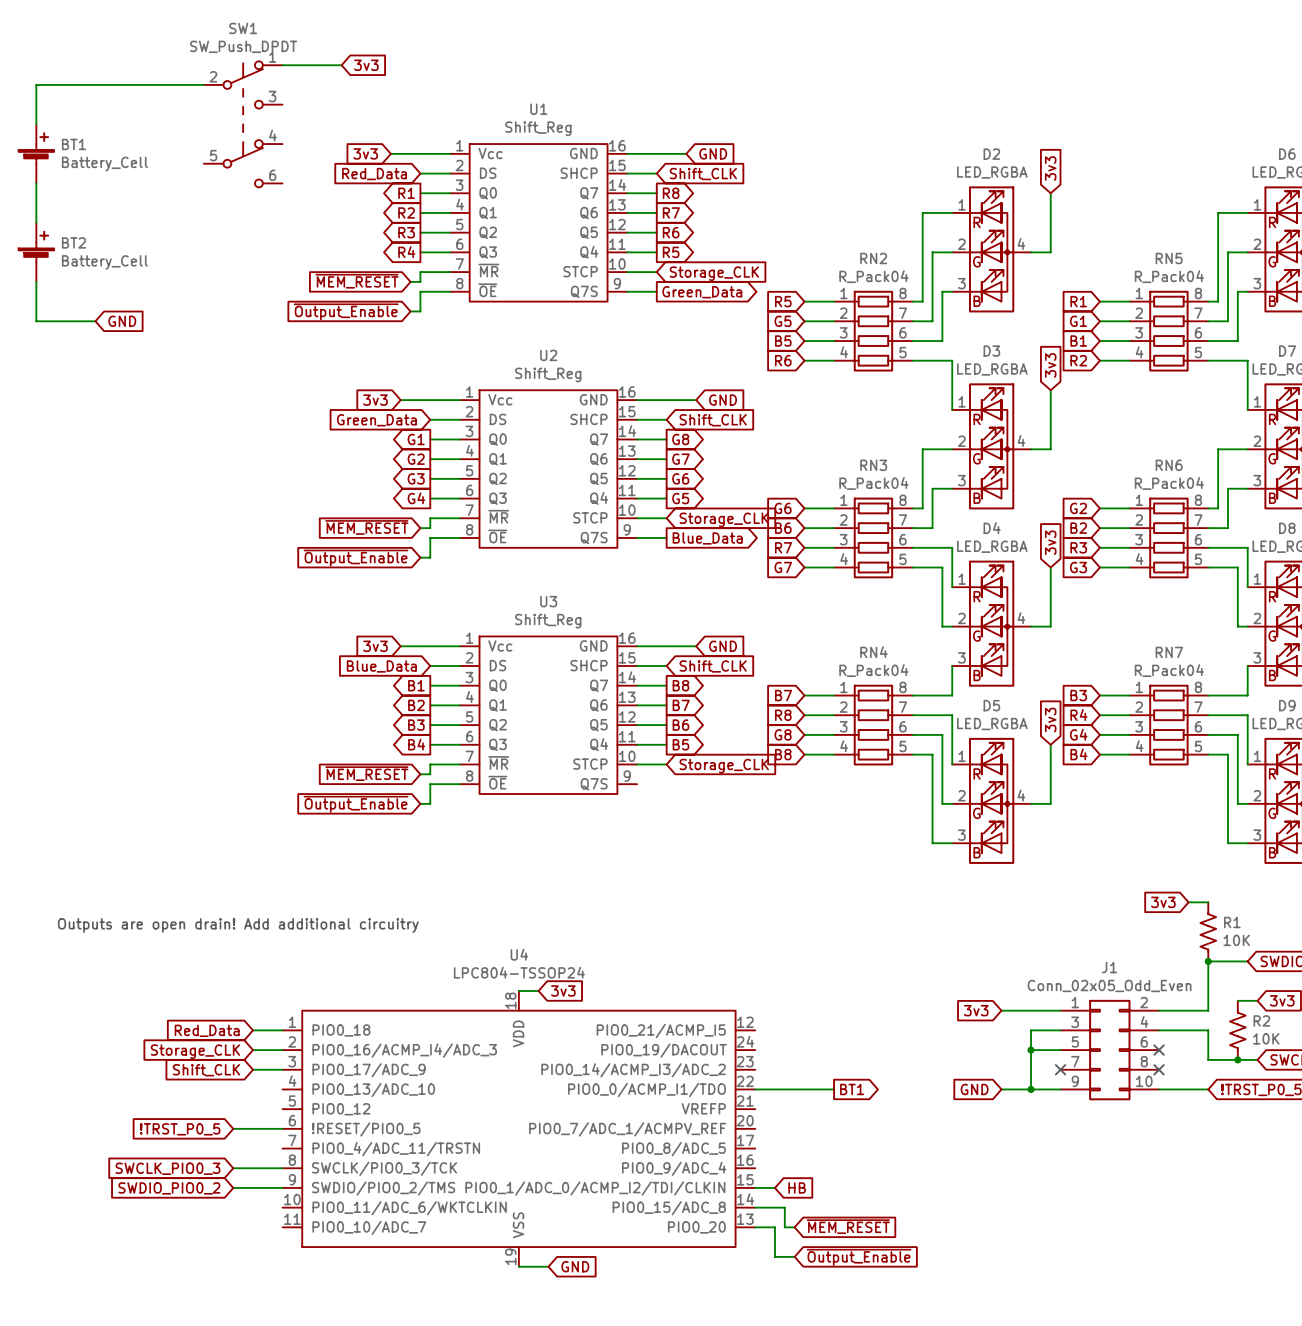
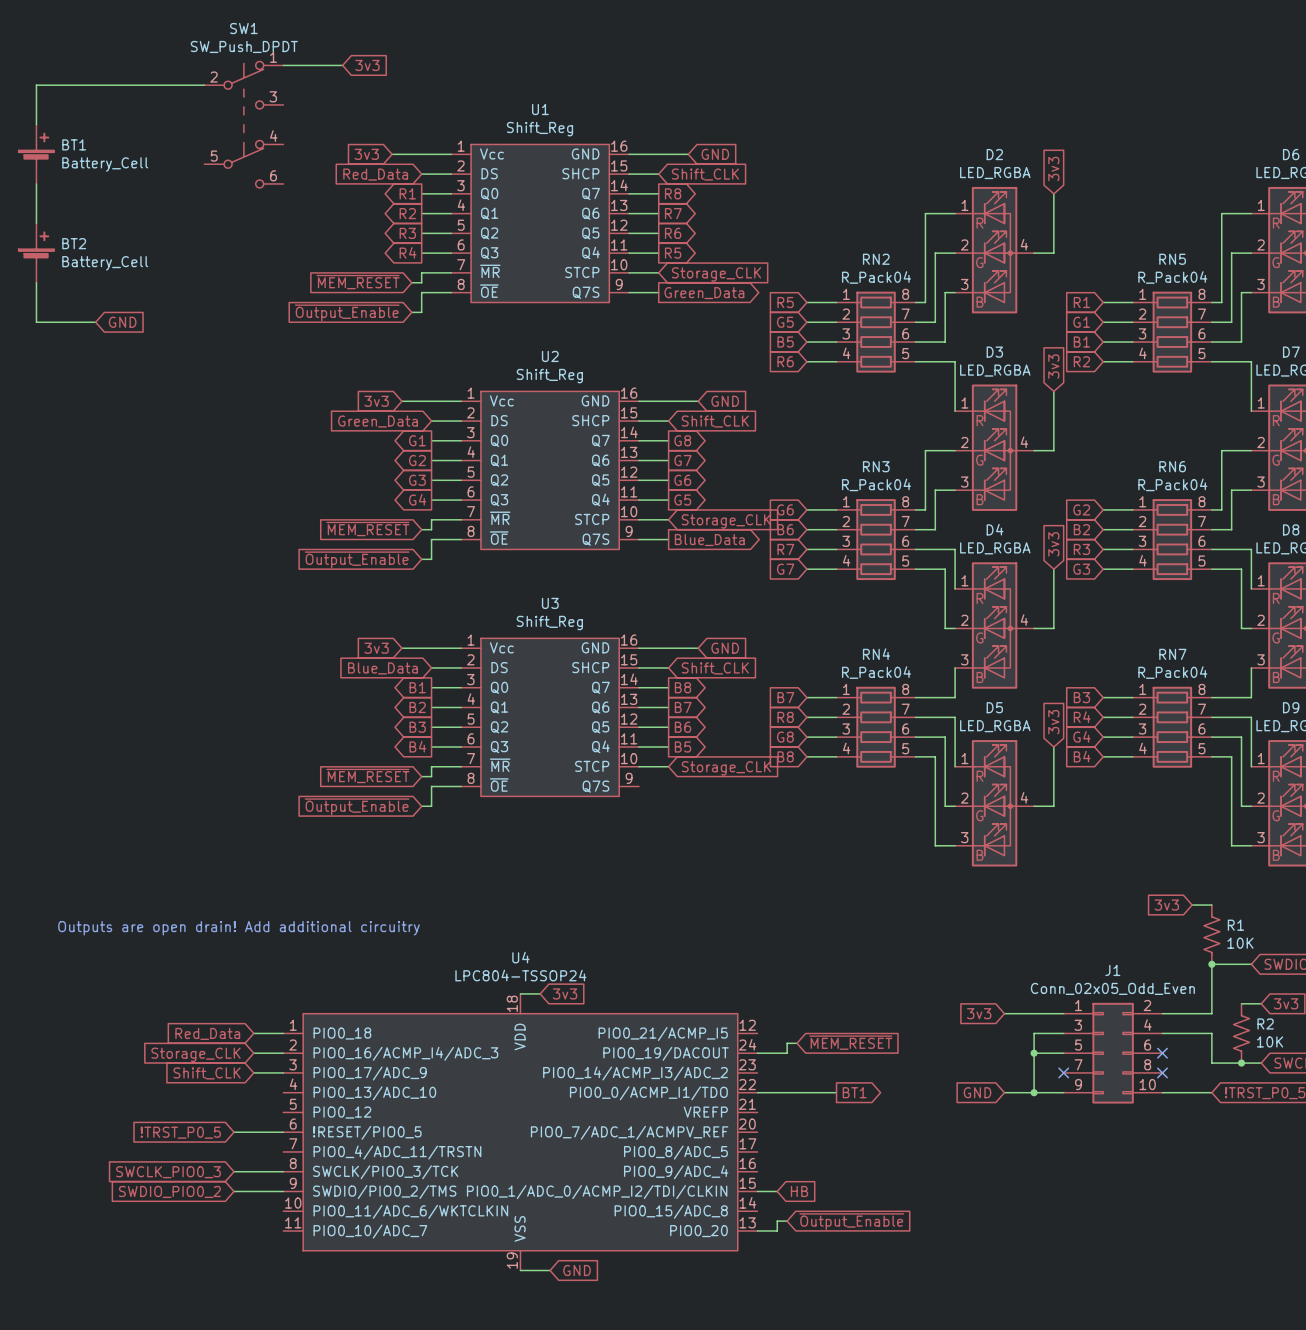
wire: none -> (797, 1043) (787, 1043) (787, 1053) (757, 1053)
wire: (755, 1207) (784, 1207) (784, 1227) (794, 1227) -> none
global label position: ~{MEM_RESET} (848, 1226) -> ~{MEM_RESET} (850, 1042)
wire: (774, 1227) (774, 1256) (794, 1256) -> (777, 1230) (777, 1221) (787, 1221)
global label position: ~{Output_Enable} (859, 1257) -> ~{Output_Enable} (851, 1221)

